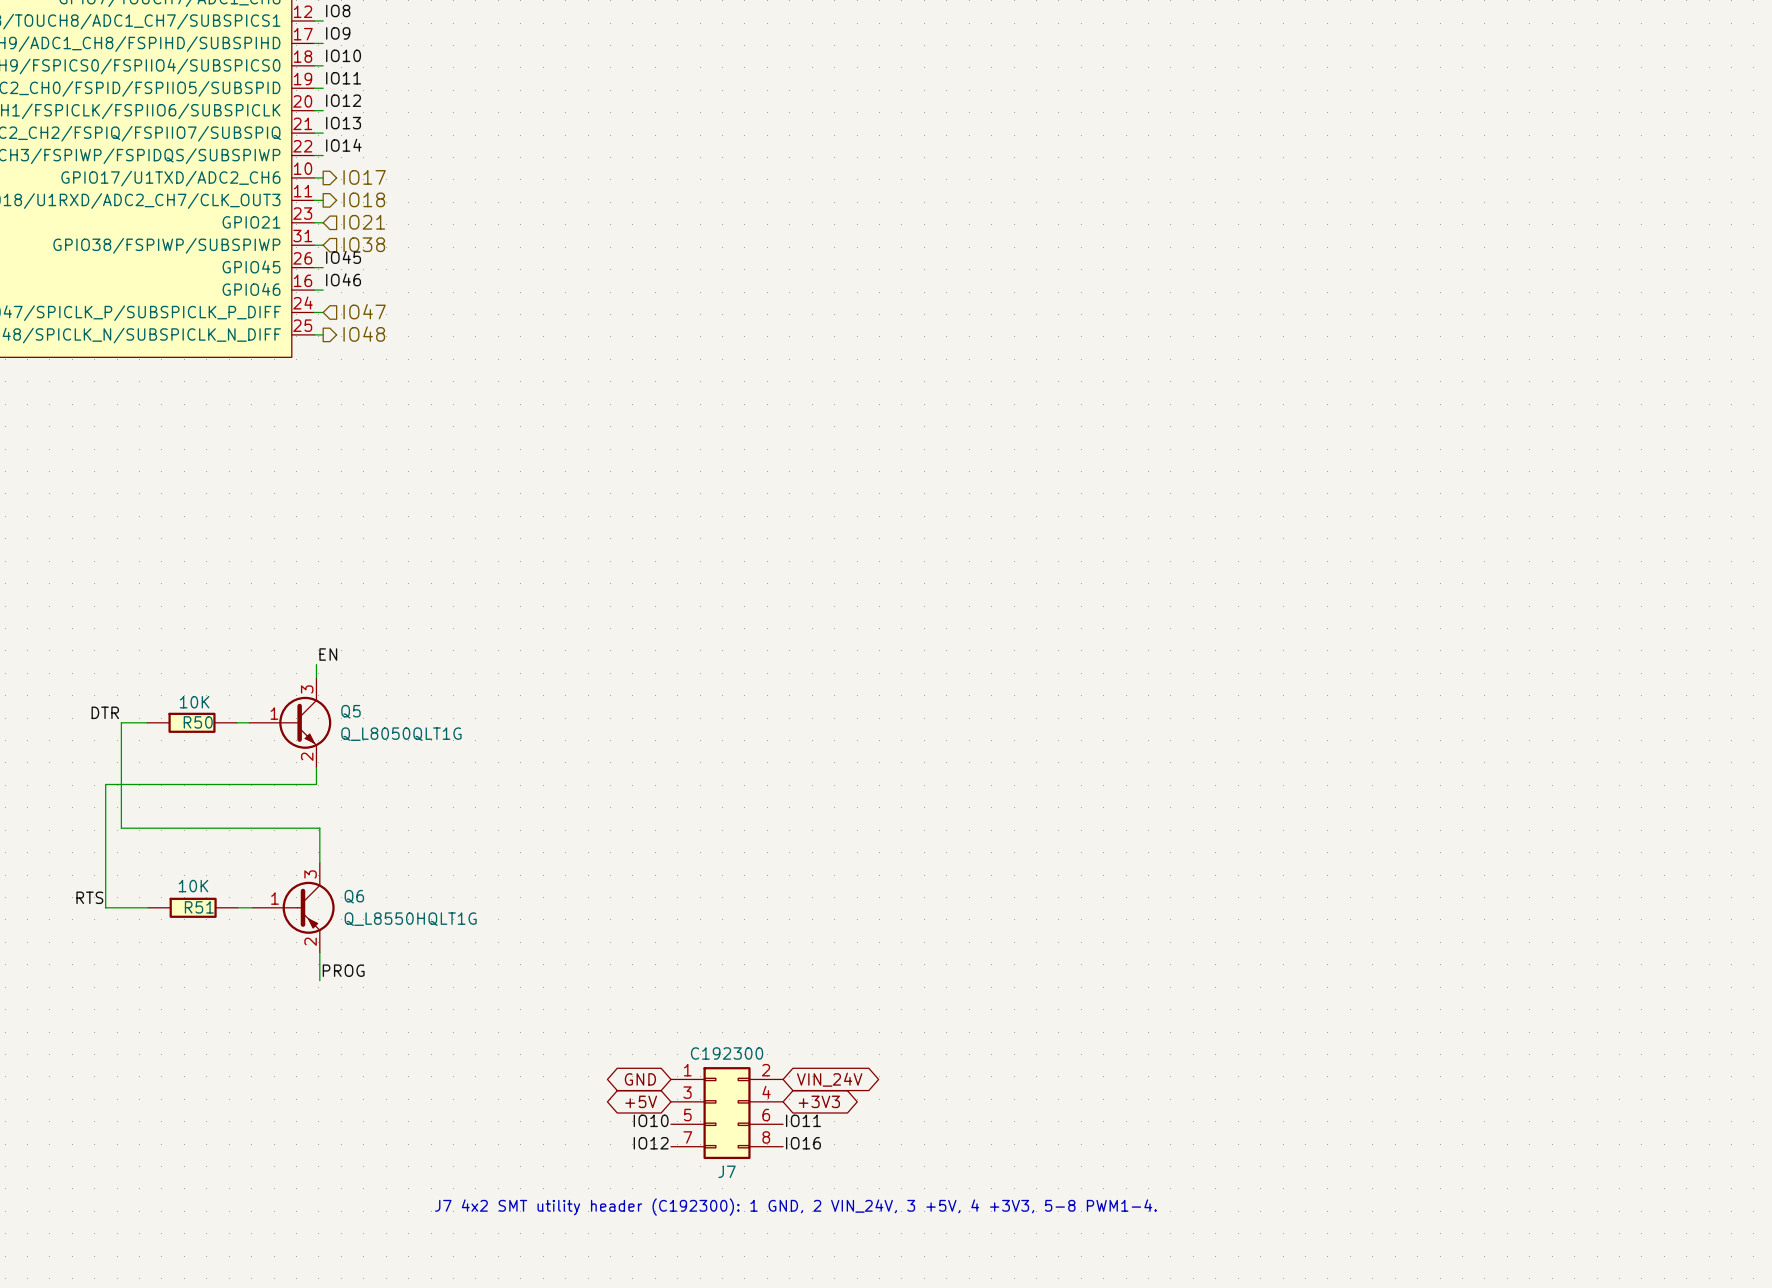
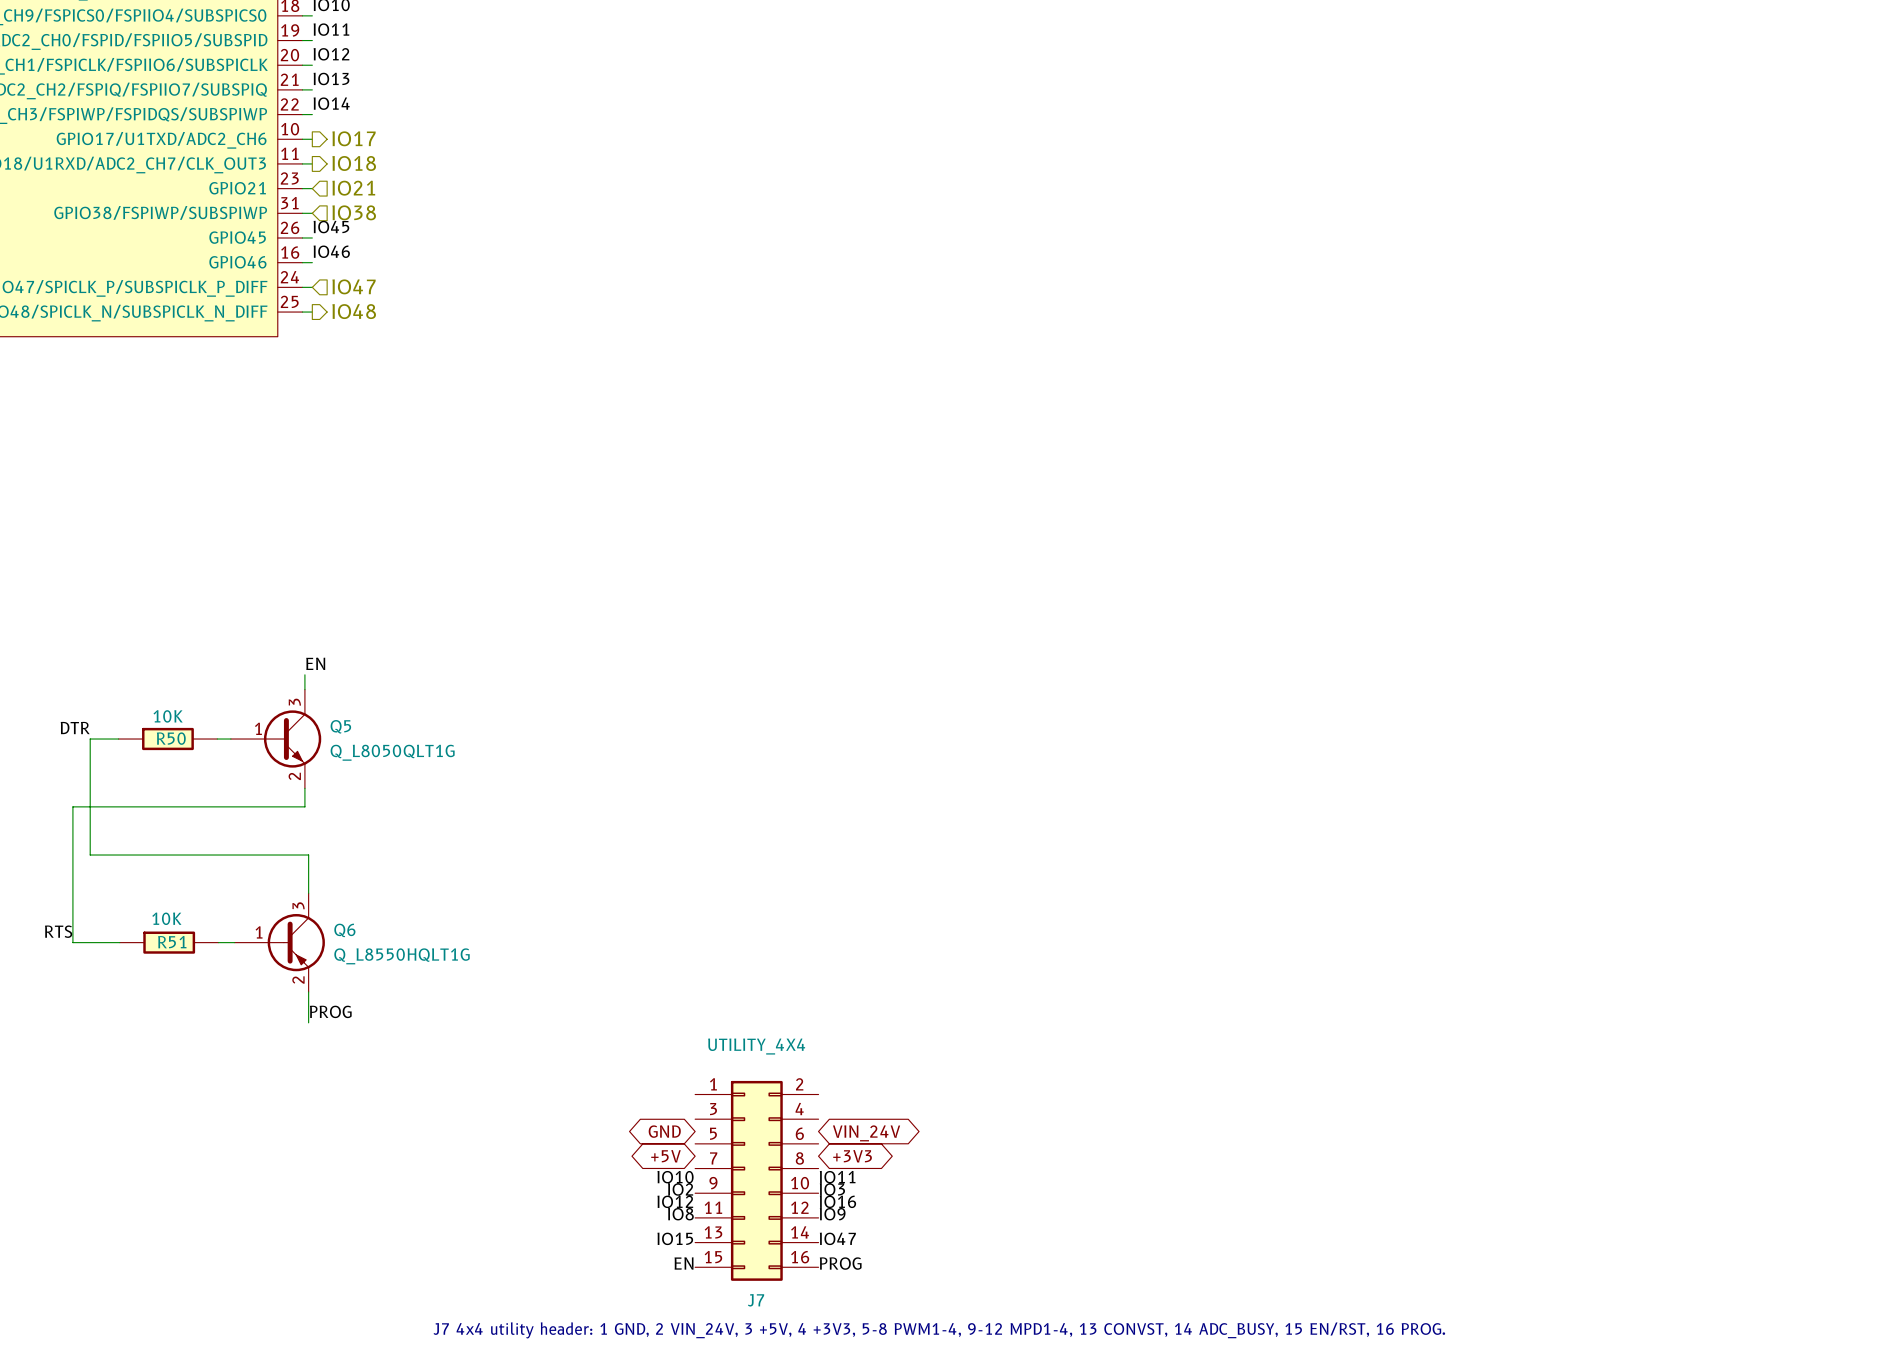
J7 value: C192300 (727, 1053) -> UTILITY_4X4 (756, 1046)
J7 symbol: [670, 1067, 784, 1160] -> [695, 1080, 819, 1281]
label: none -> IO2 (680, 1189)
label: none -> IO3 (832, 1189)
label: none -> IO8 (680, 1214)
label: none -> IO9 (832, 1214)
J7 name position: J7 (727, 1171) -> J7 (756, 1300)
label: none -> IO15 (675, 1238)
label: none -> IO47 (837, 1238)
label: none -> EN (684, 1263)
label: none -> PROG (840, 1263)
text: J7 4x2 SMT utility header (C192300): 1 GND, 2 VIN_24V, 3 +5V, 4 +3V3, 5-8 PWM1-4. (795, 1207) -> none
text: none -> J7 4x4 utility header: 1 GND, 2 VIN_24V, 3 +5V, 4 +3V3, 5-8 PWM1-4, 9-12 MPD1-4, 13 CONVST, 14 ADC_BUSY, 15 EN/RST, 16 PROG. (939, 1330)

